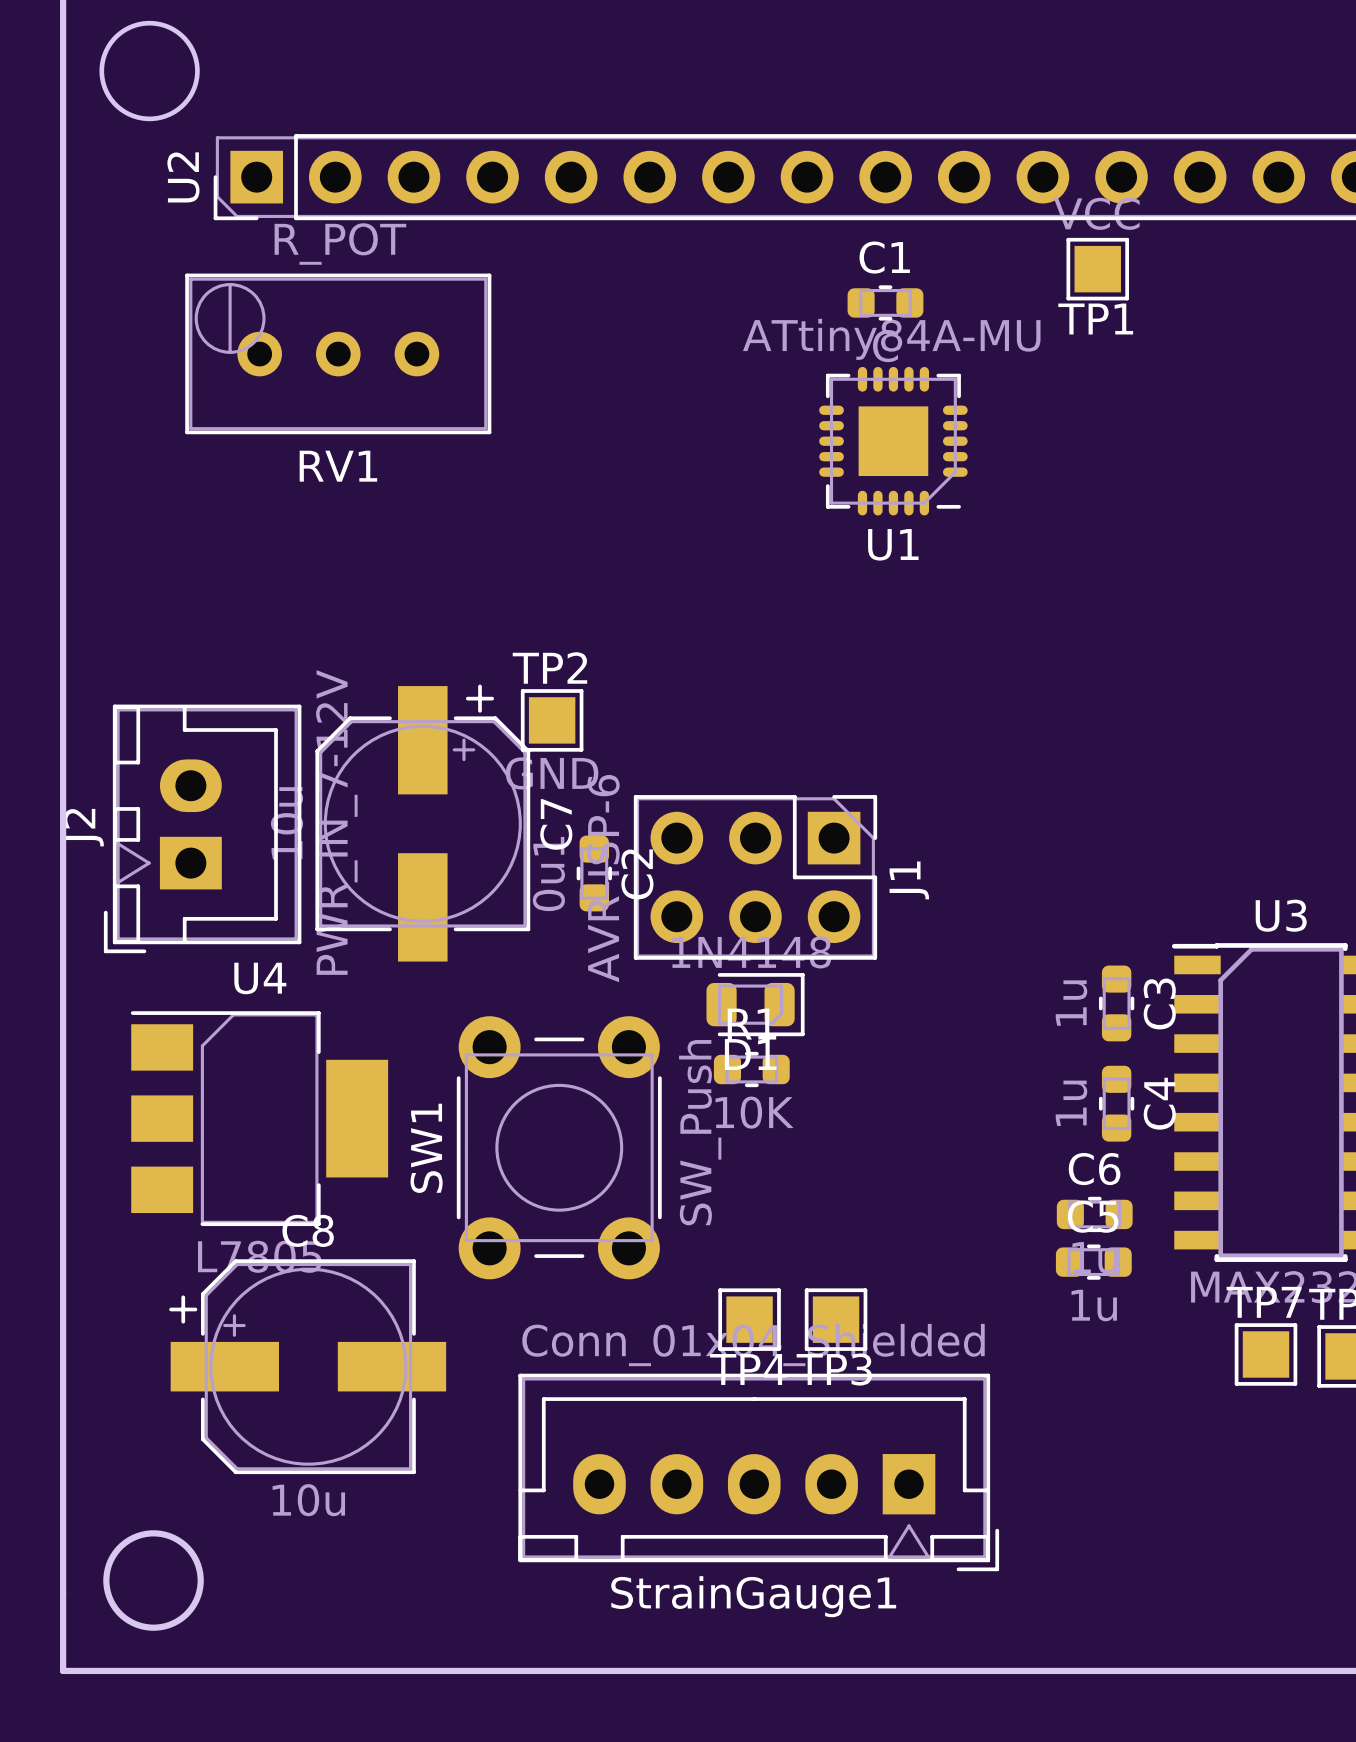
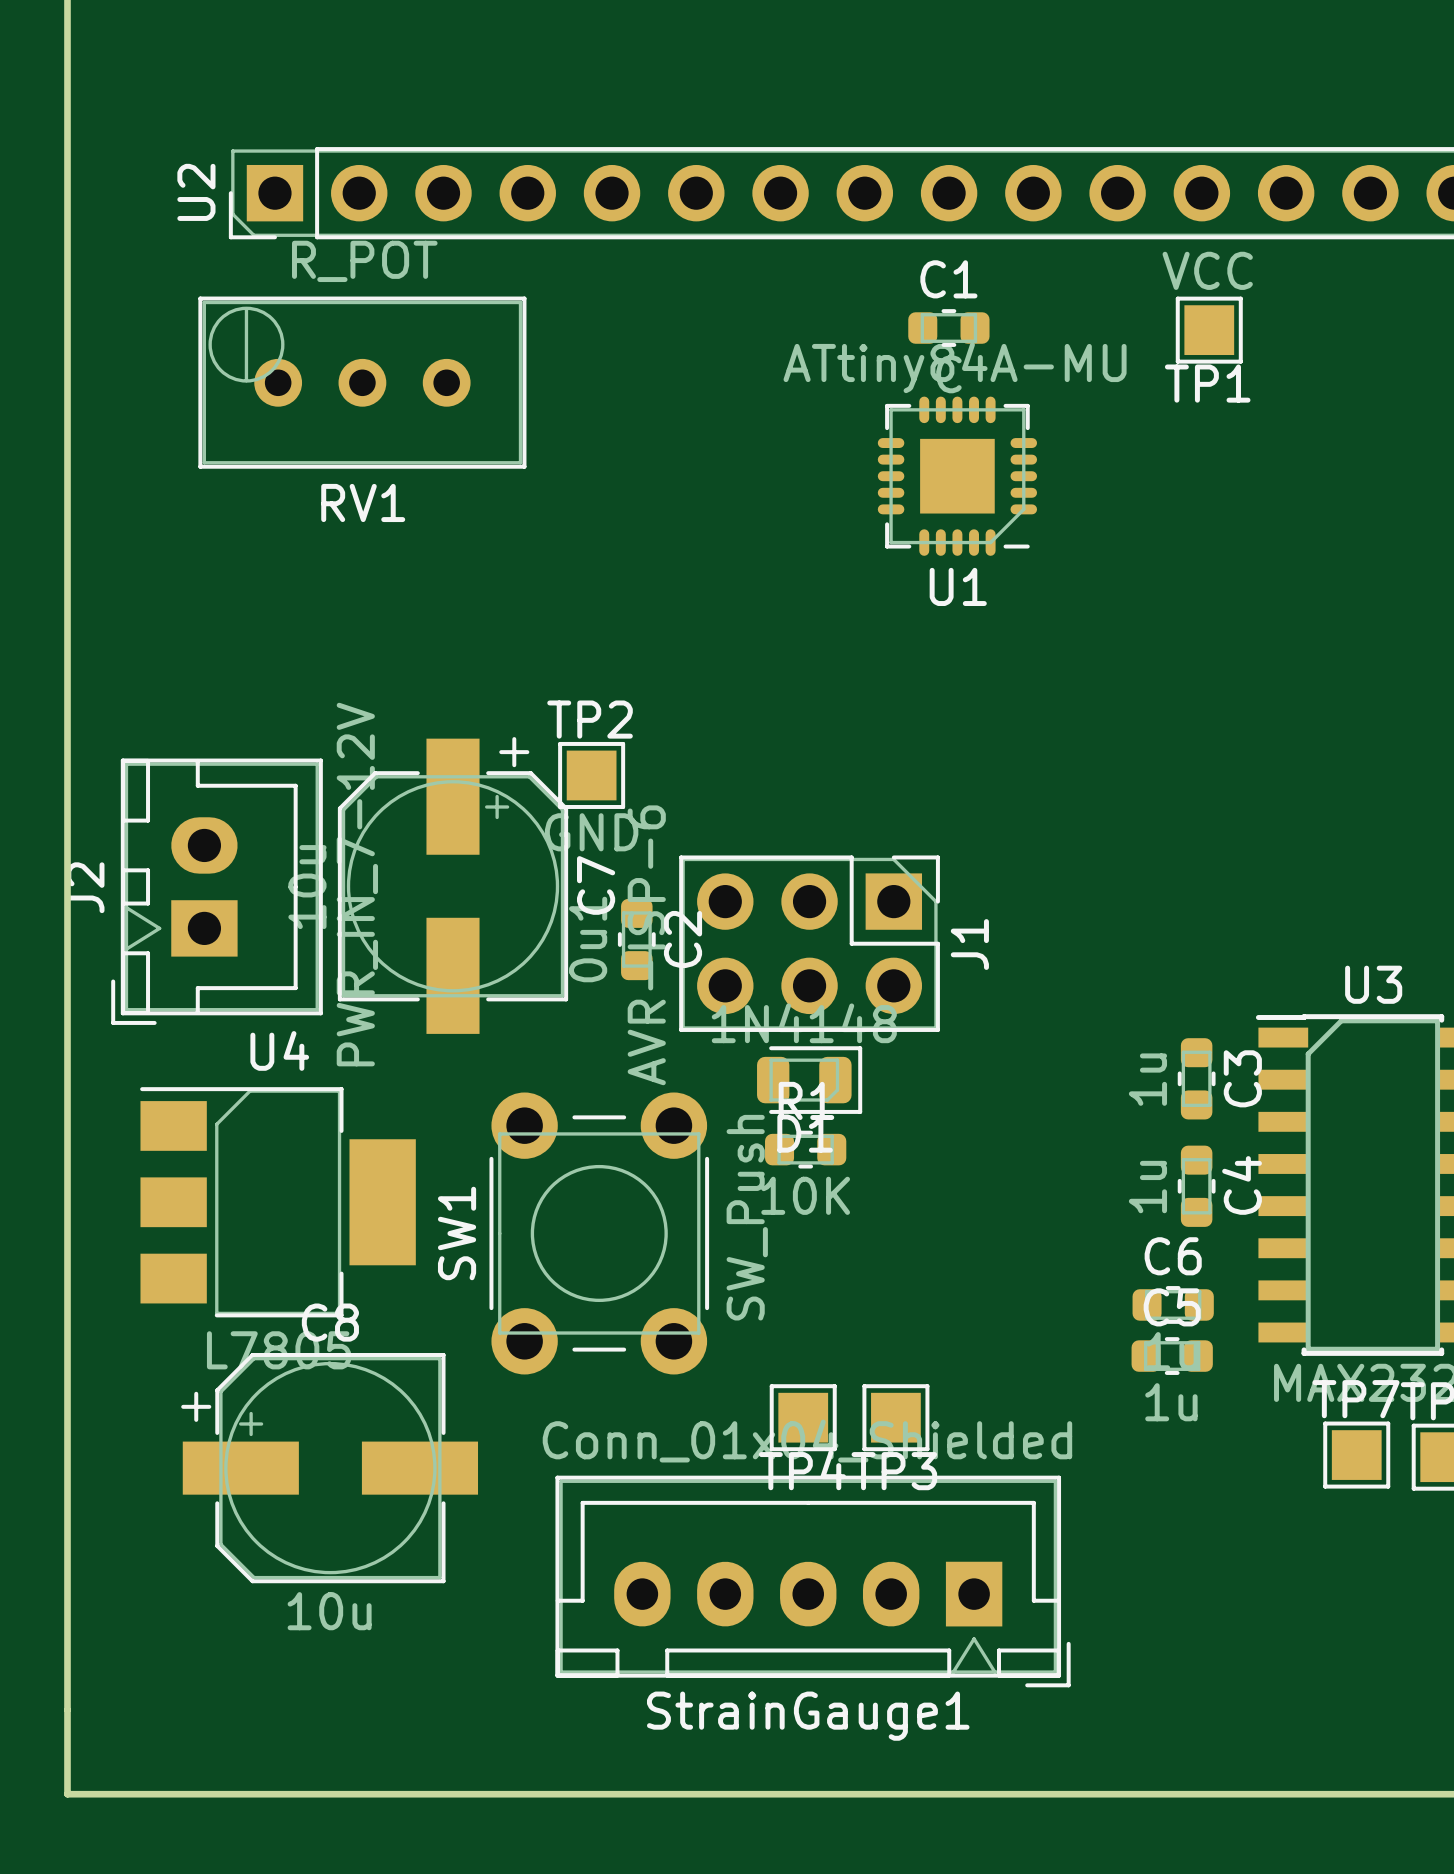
round board edge: [99, 20, 200, 122] -> none
TP1 position: (1097, 269) -> (1209, 330)
round board edge: [103, 1530, 204, 1631] -> none

